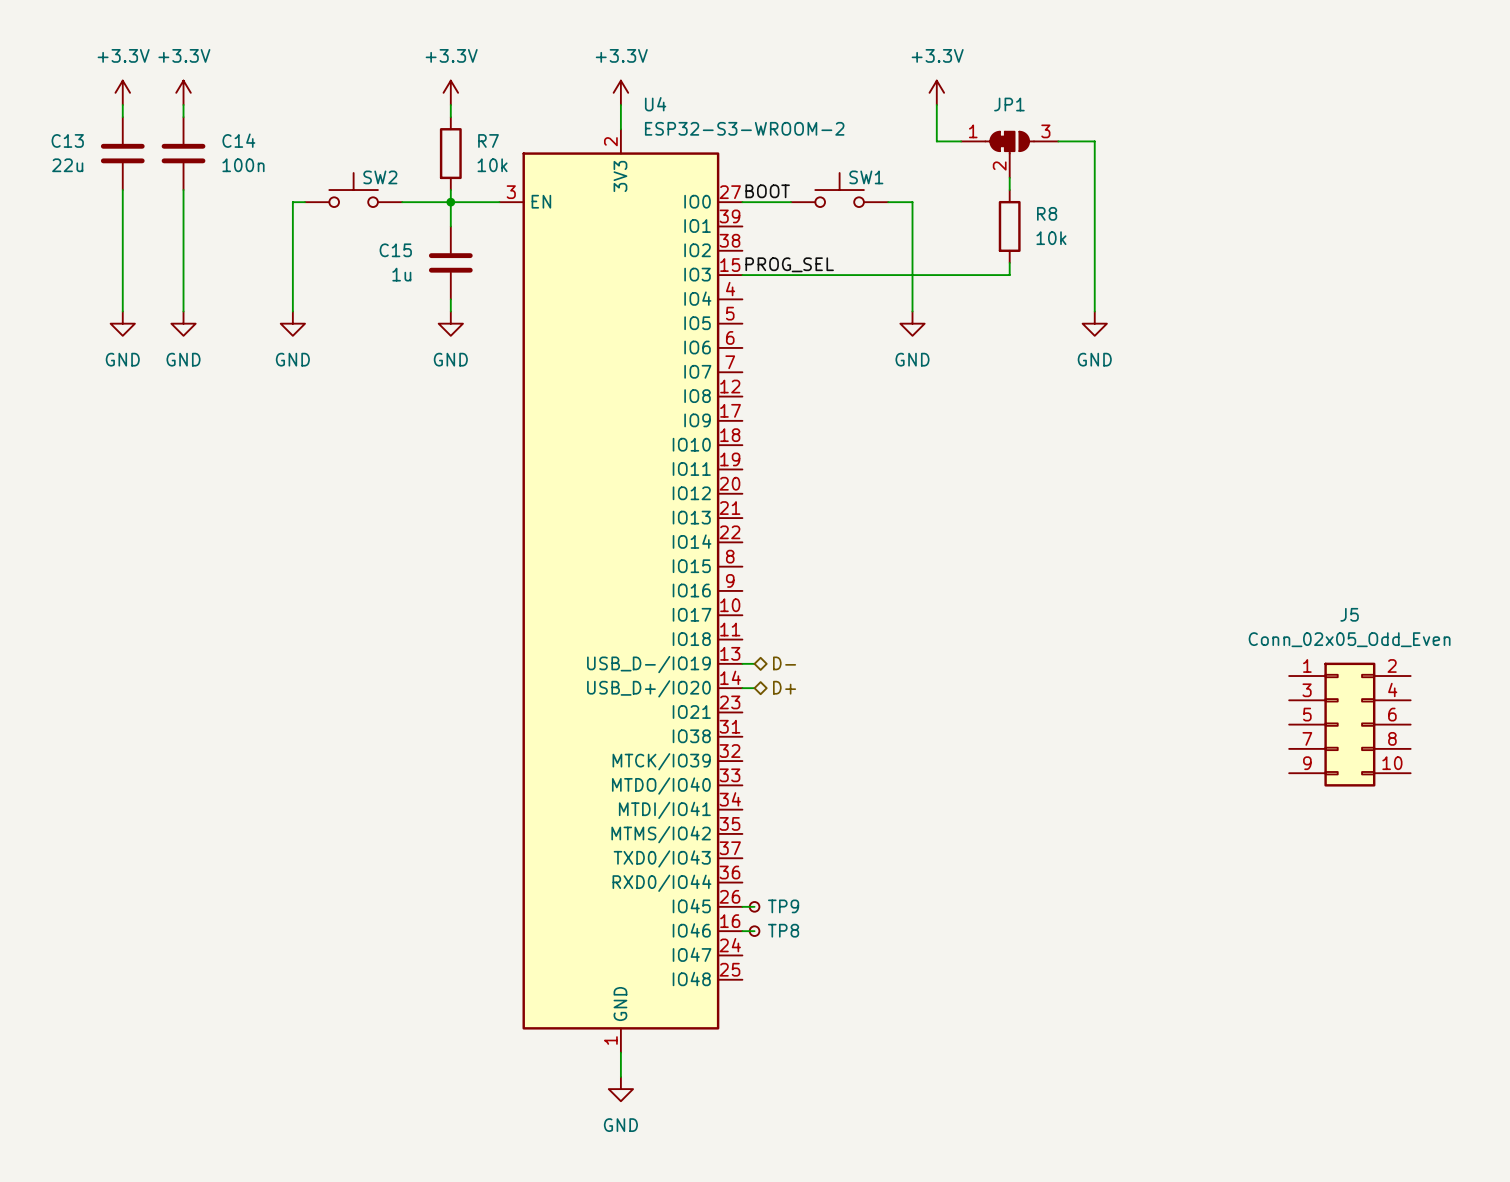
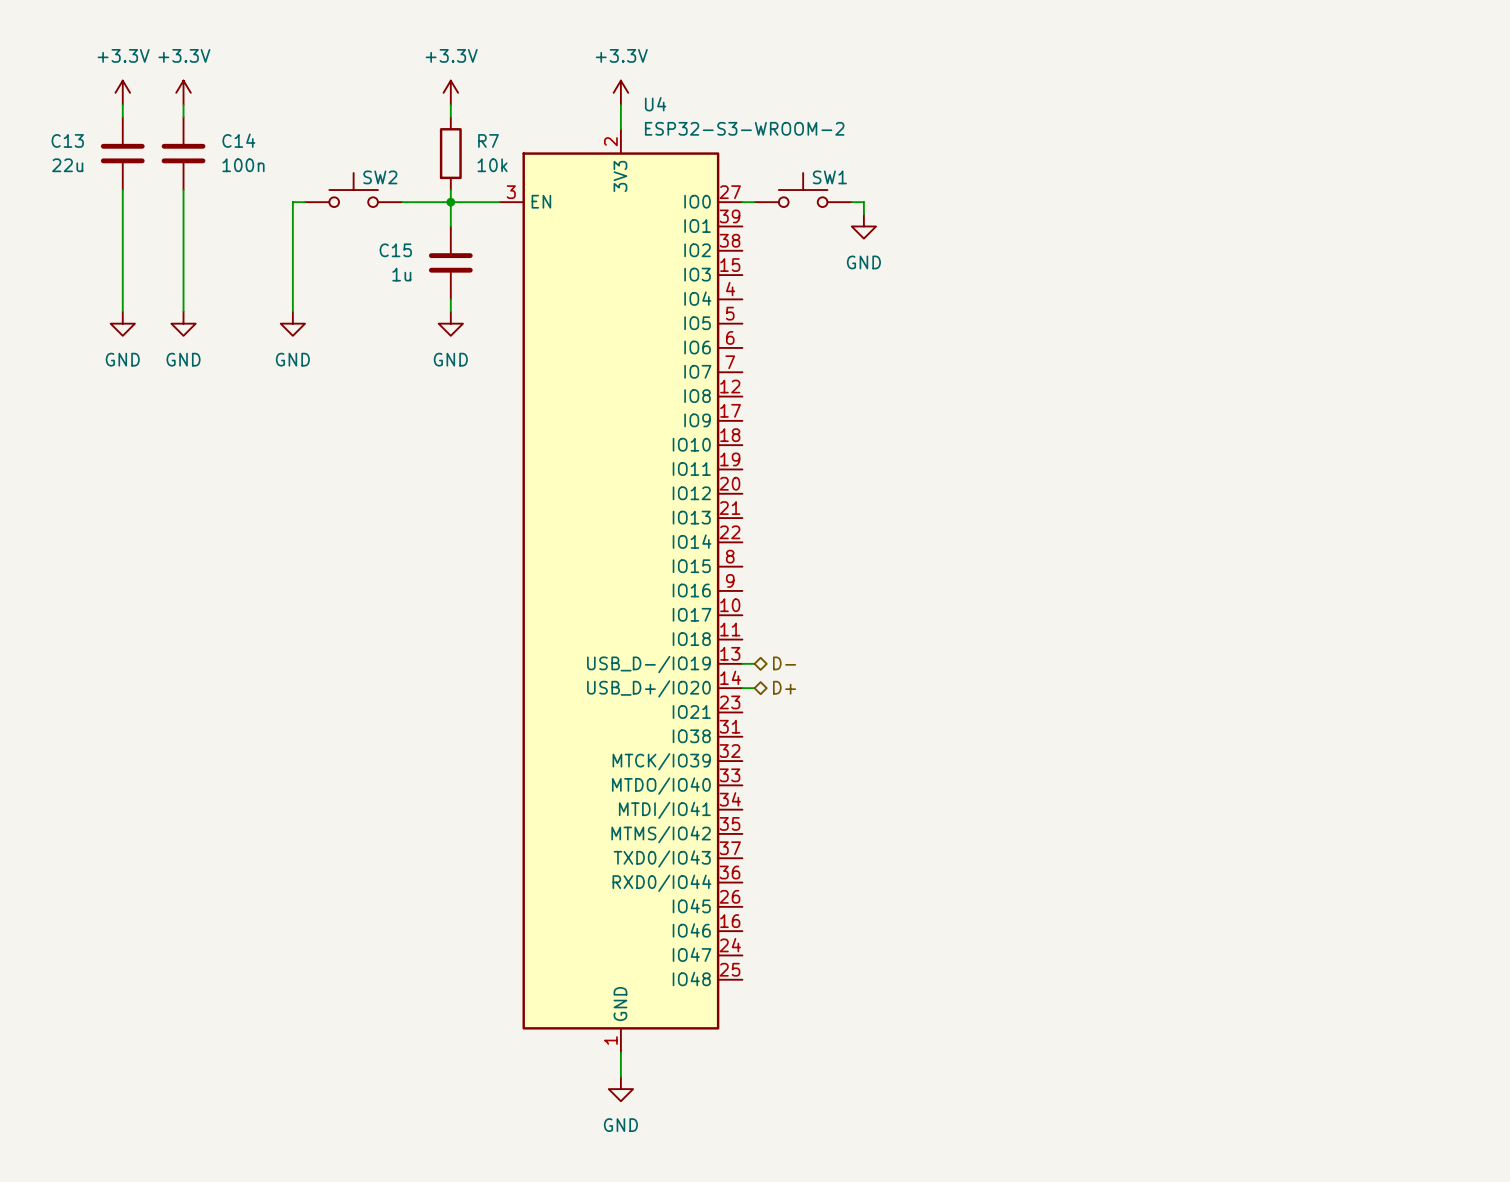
power symbol: +3.3V (936, 92) -> none
wire: (936, 104) (936, 141) (961, 141) -> none
wire: (1058, 141) (1094, 141) (1094, 311) -> none
JP1: (1009, 154) -> none
wire: (1009, 177) (1009, 190) -> none
SW1 position: (839, 190) -> (803, 190)
label: BOOT (767, 191) -> none
wire: none -> (851, 202) (863, 202) (863, 214)
wire: (888, 202) (912, 202) (912, 311) -> none
R8: 10k (1009, 226) -> none
wire: (1009, 262) (1009, 275) (742, 275) -> none
label: PROG_SEL (789, 264) -> none
power symbol position: GND (912, 323) -> GND (863, 226)
power symbol: GND (1094, 323) -> none
J5: Conn_02x05_Odd_Even (1349, 724) -> none
wire: (742, 906) (754, 906) -> none
TP9: (754, 906) -> none
wire: (742, 931) (754, 931) -> none
TP8: (754, 931) -> none

